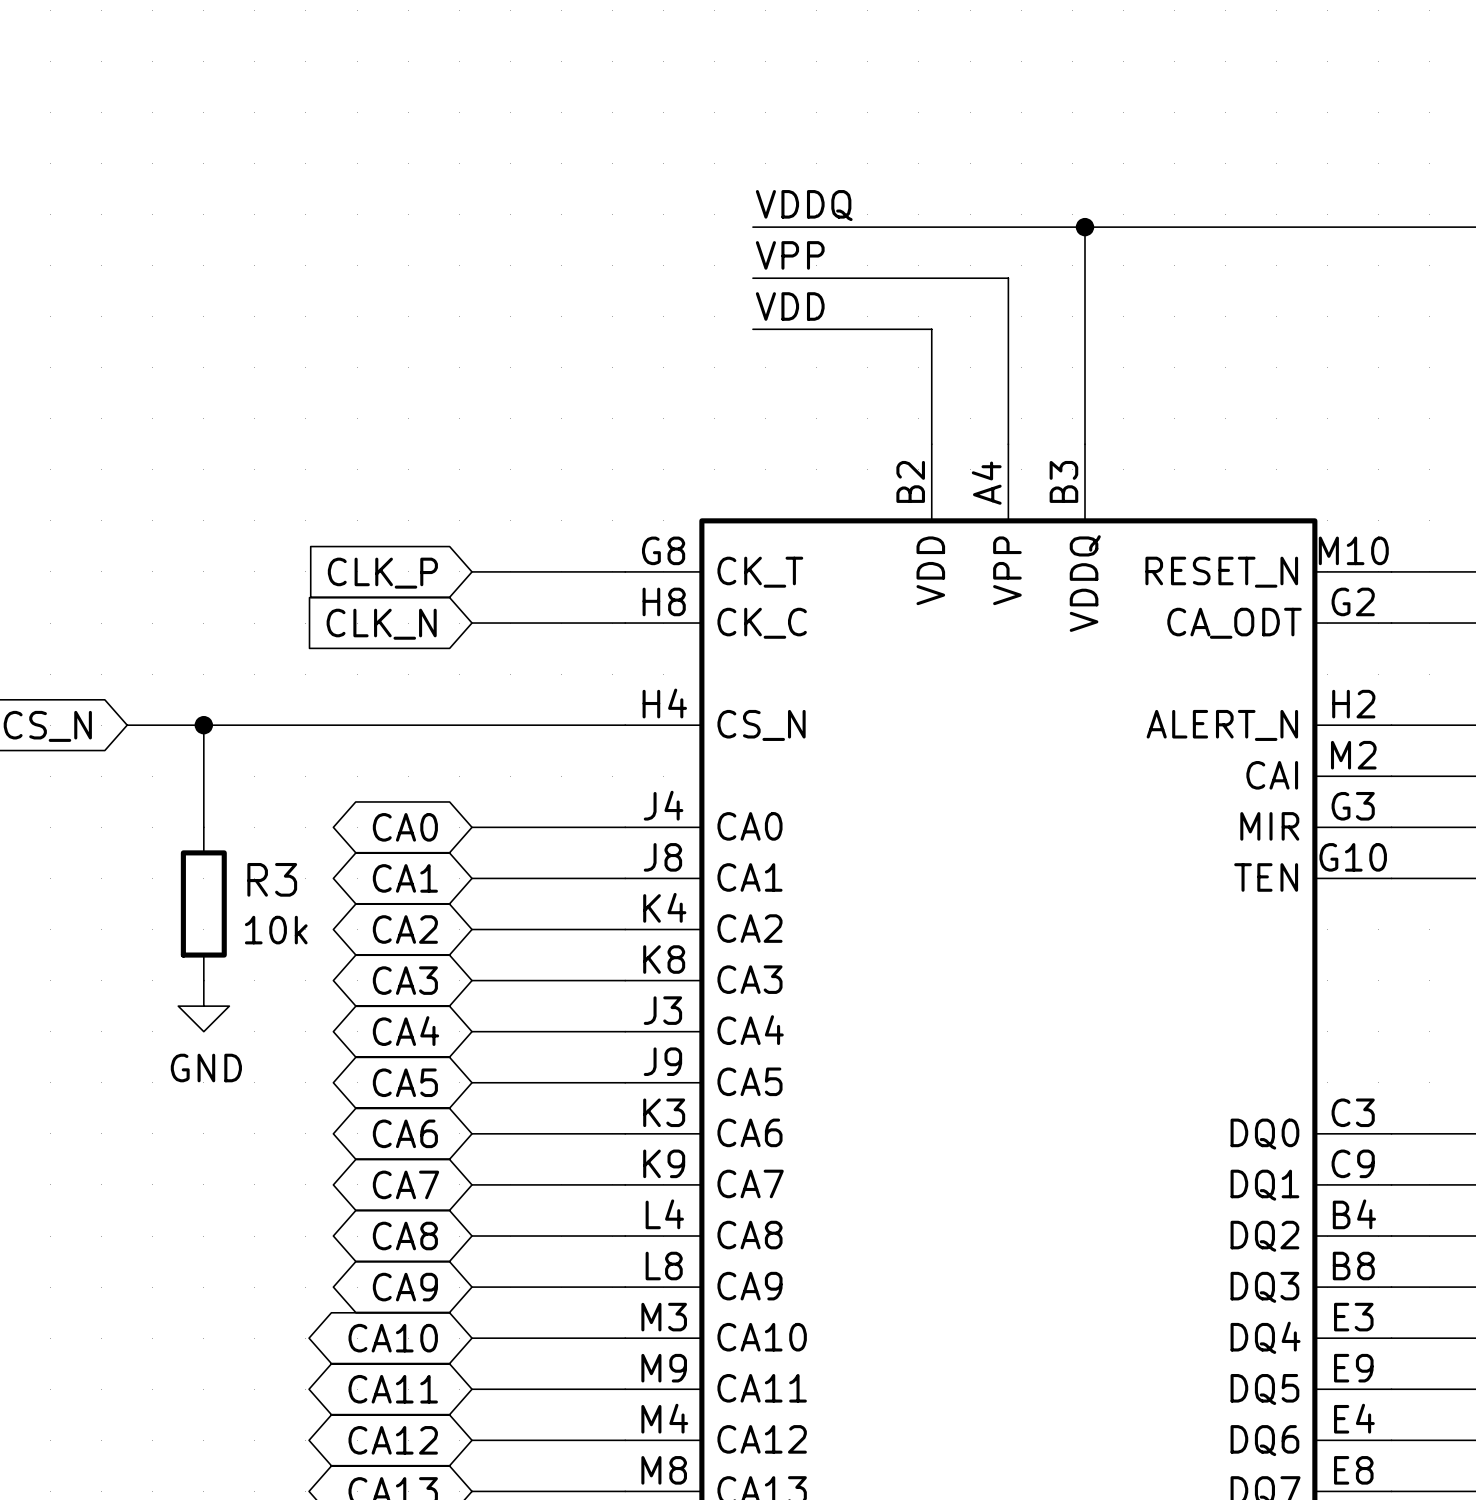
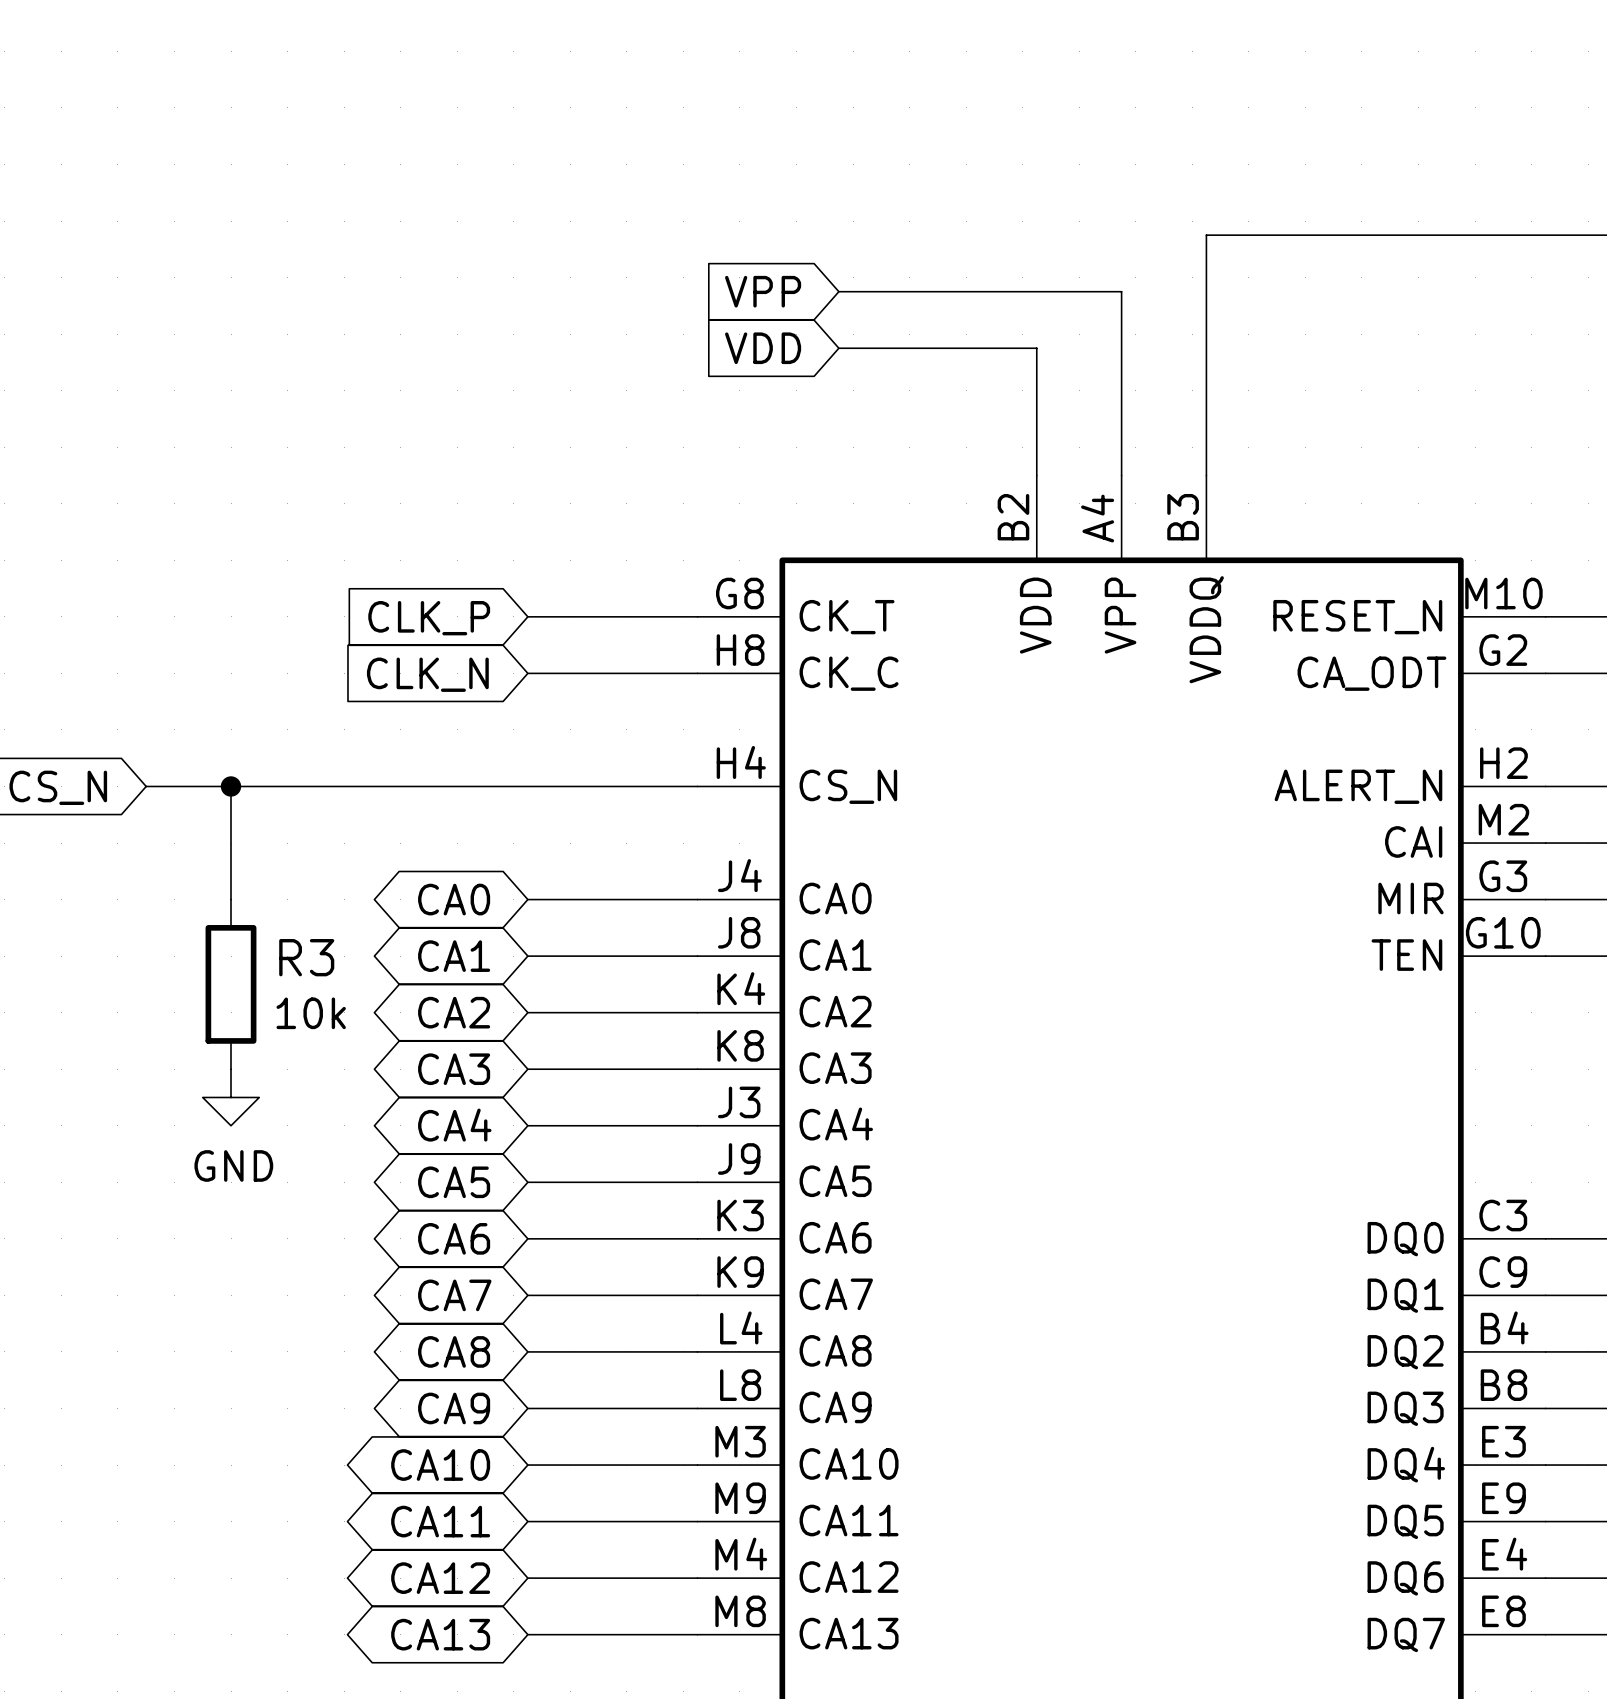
label: VDDQ (804, 205) -> none
wire: (752, 227) (1084, 227) -> none
junction: (1084, 227) -> none
label: VPP (790, 255) -> none
global label: none -> VPP (763, 291)
label: VDD (790, 306) -> none
global label: none -> VDD (763, 348)

